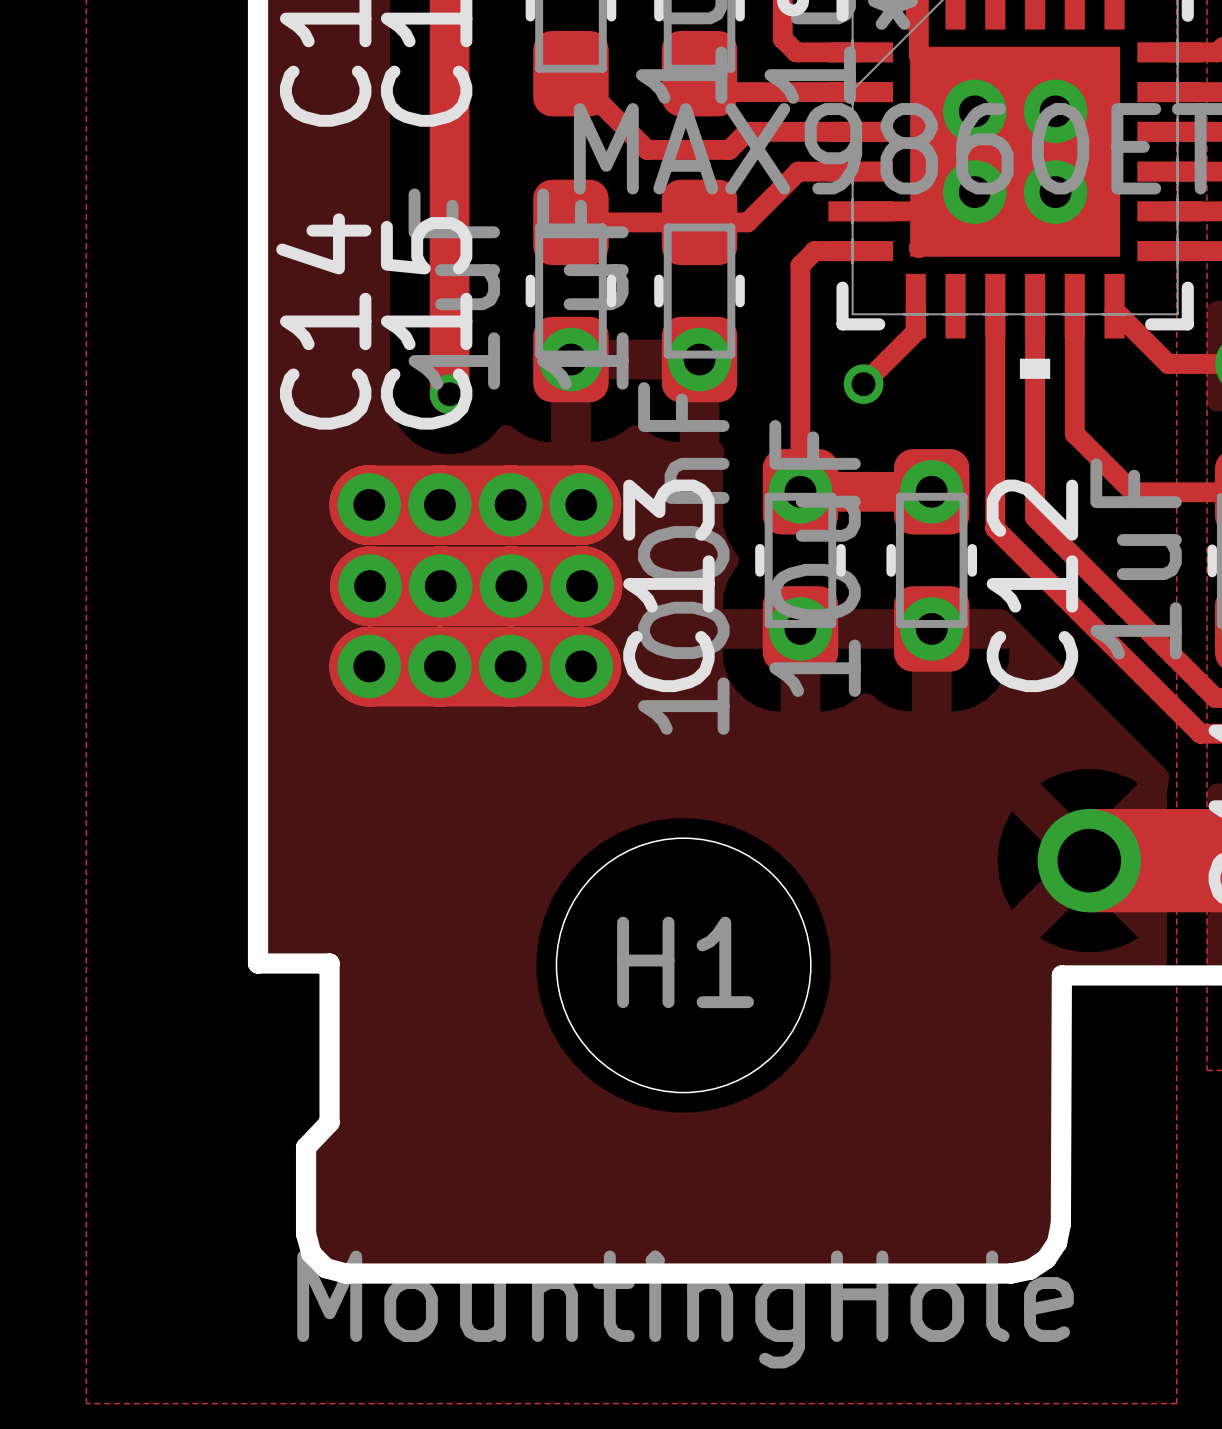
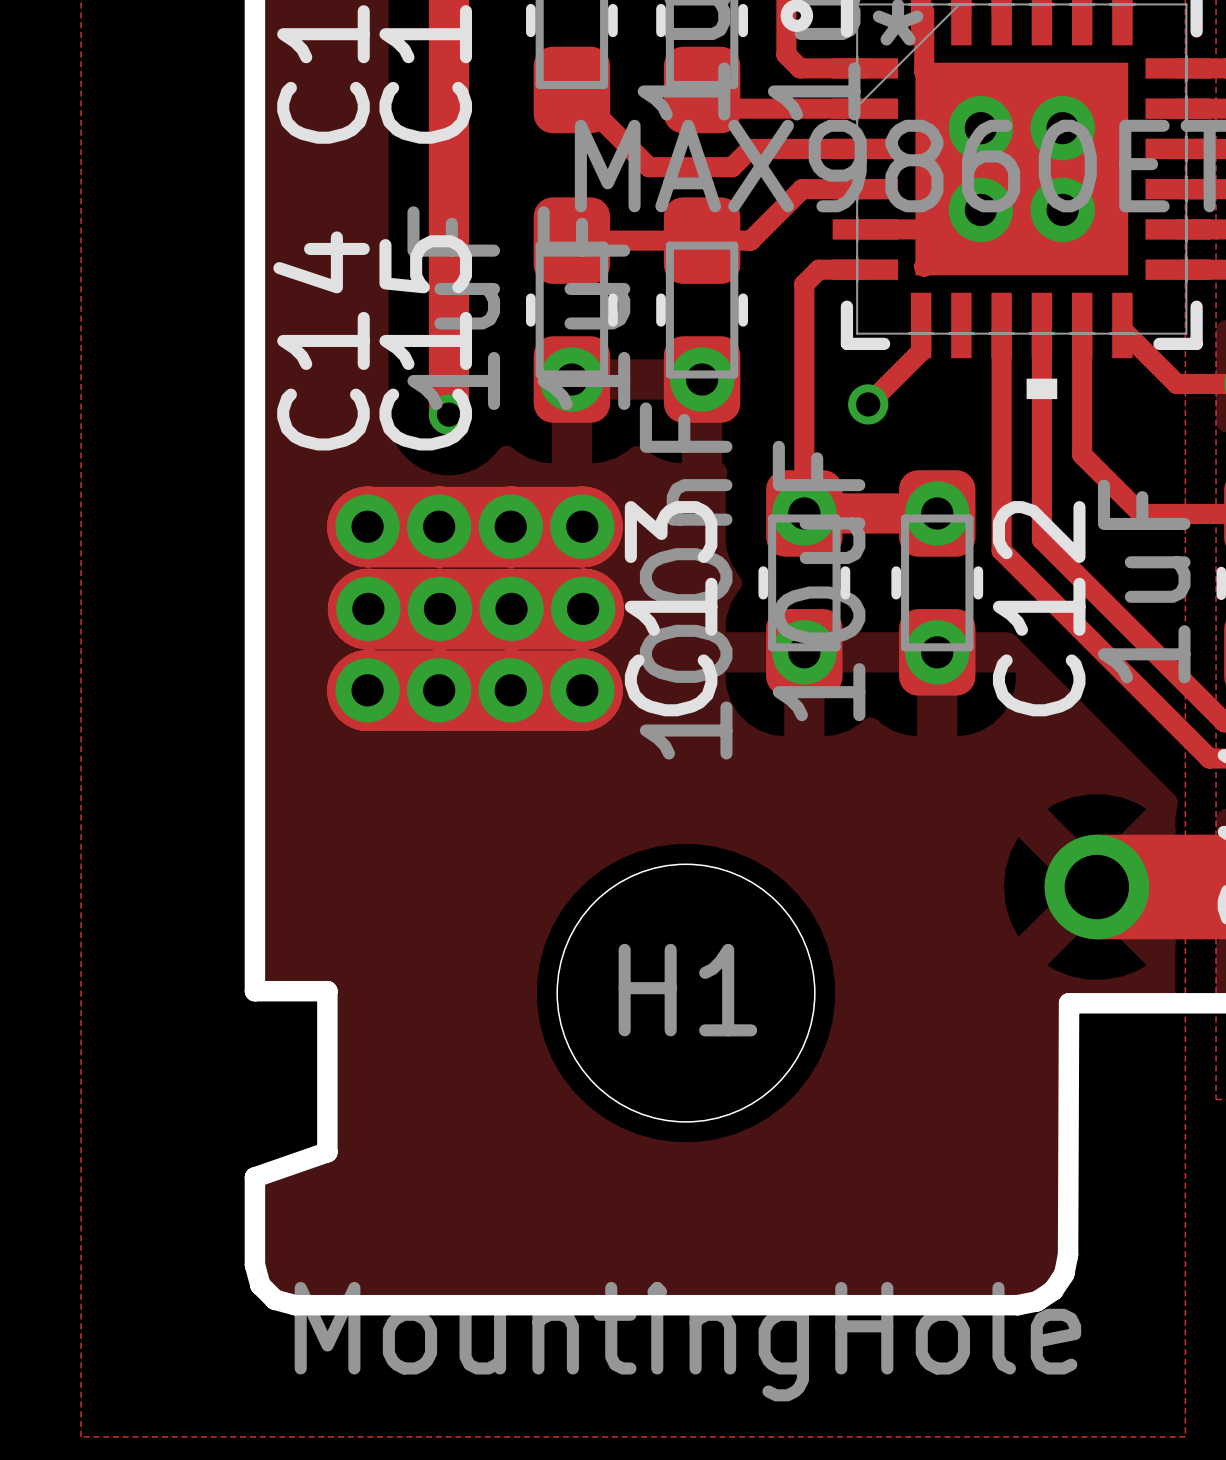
board edge: (329, 1122) (306, 1147) (306, 1233) (311, 1253) (325, 1268) (345, 1273) -> (327, 1152) (254, 1177) (254, 1264) (260, 1285) (275, 1299) (295, 1305) (343, 1305)

